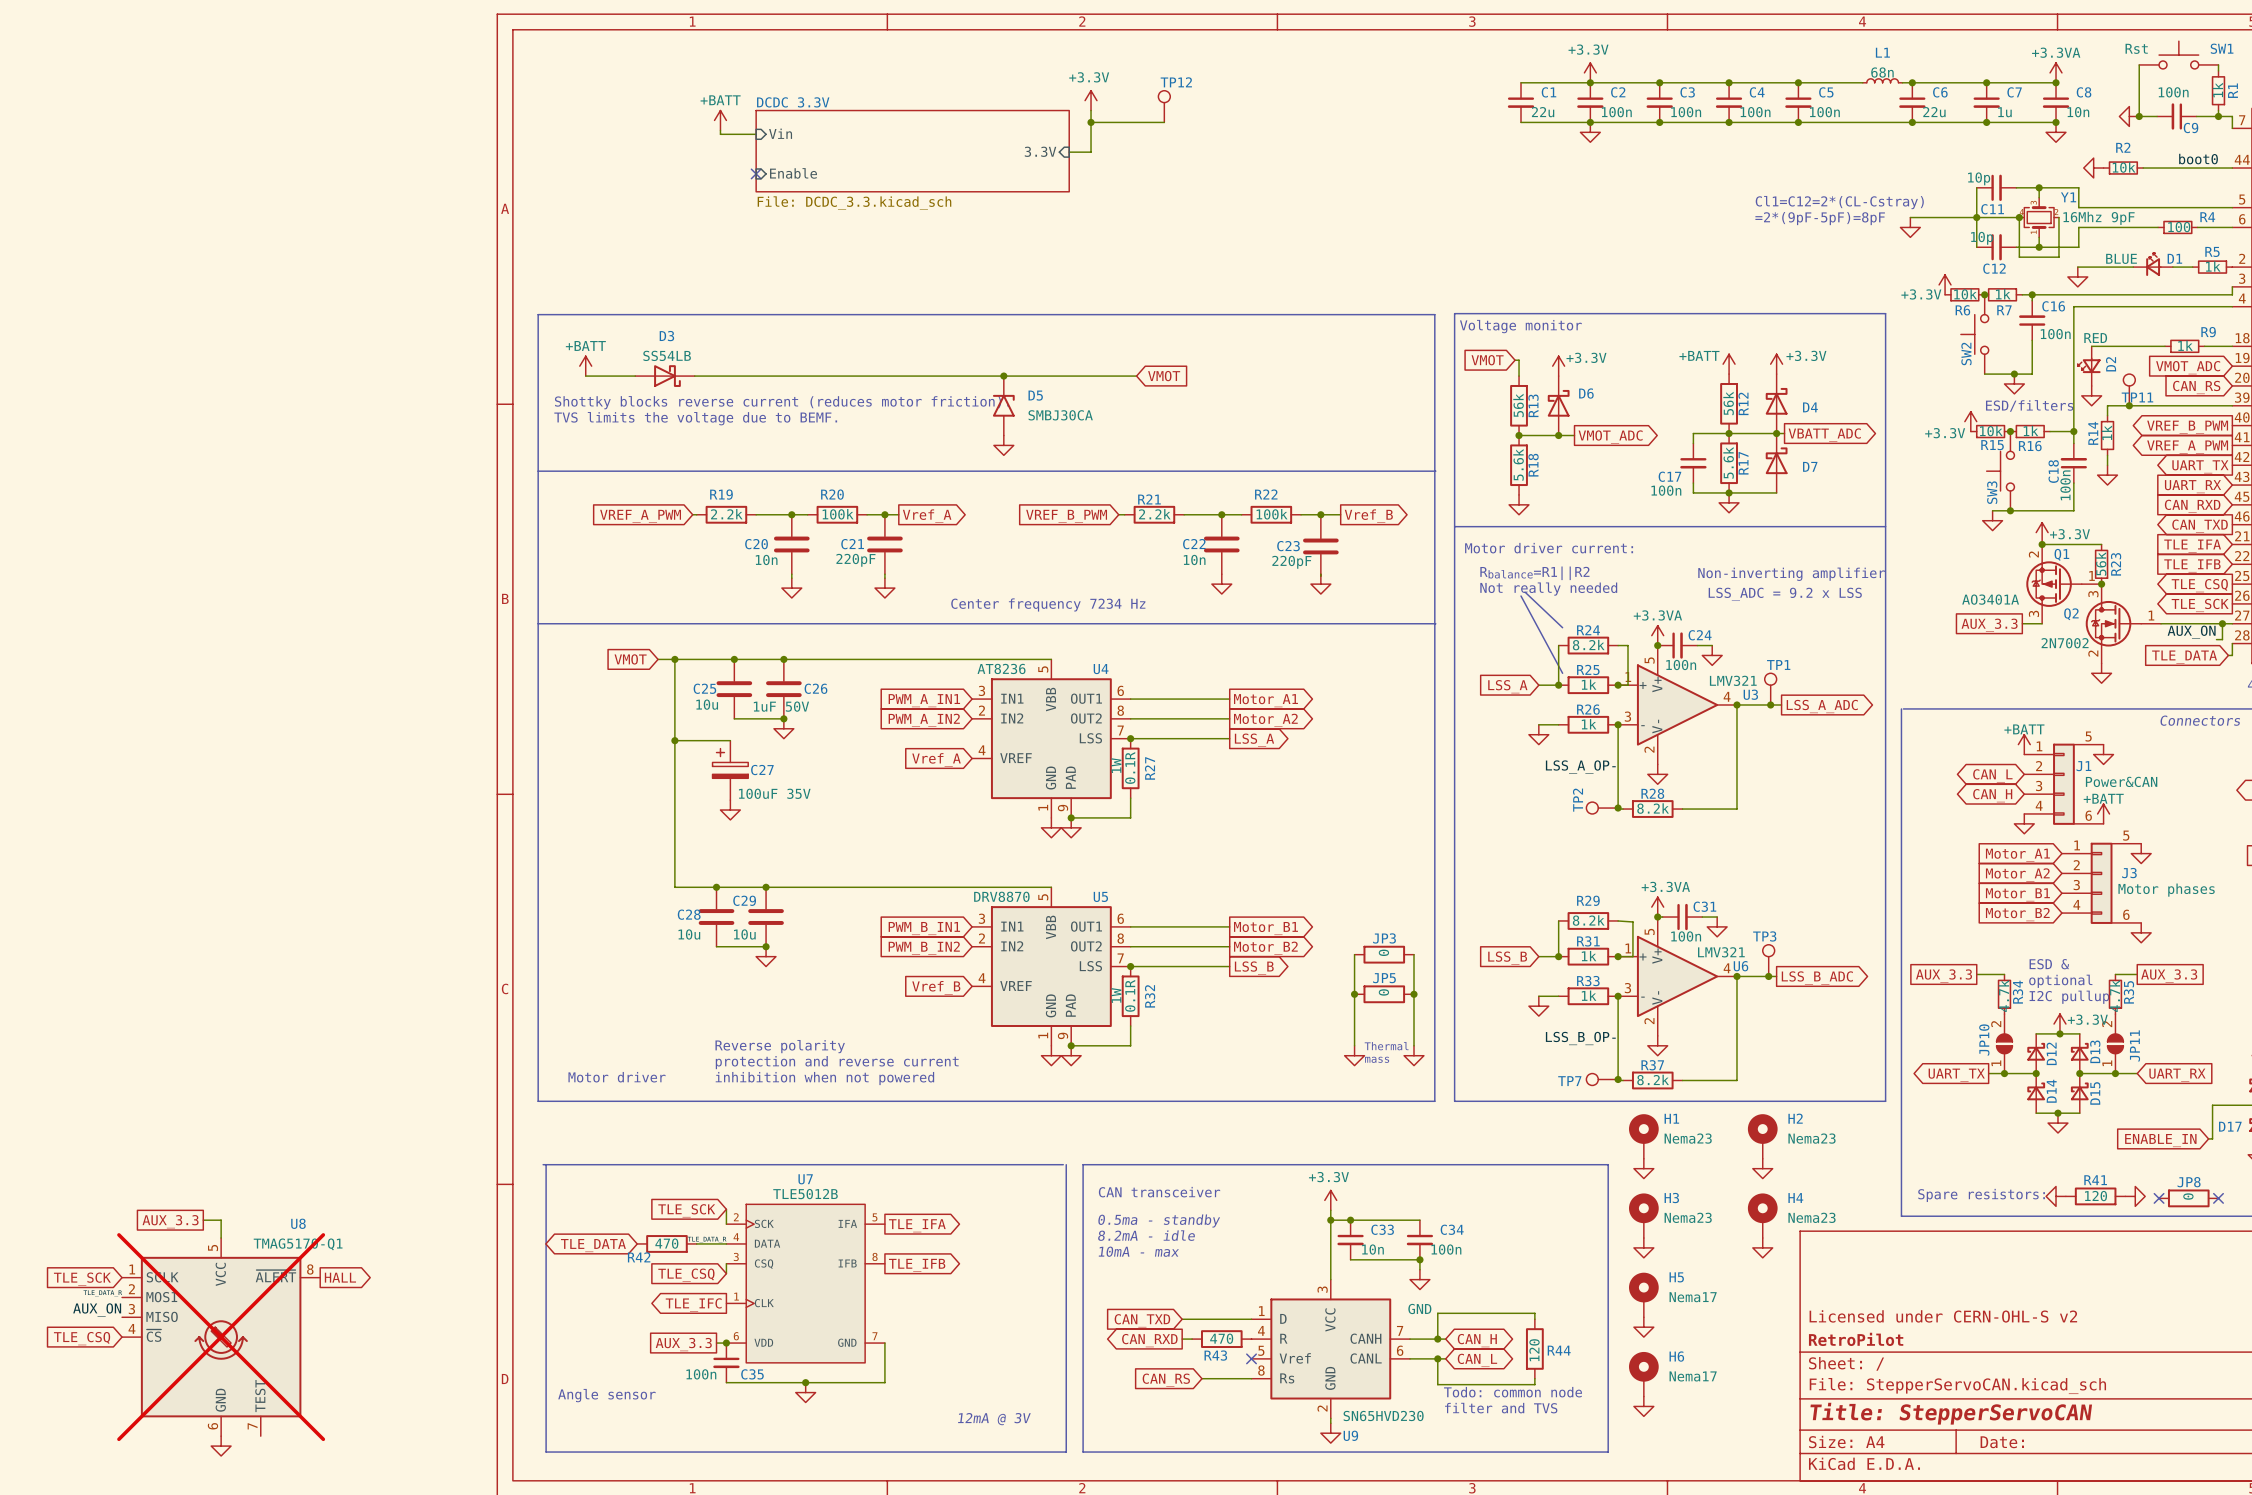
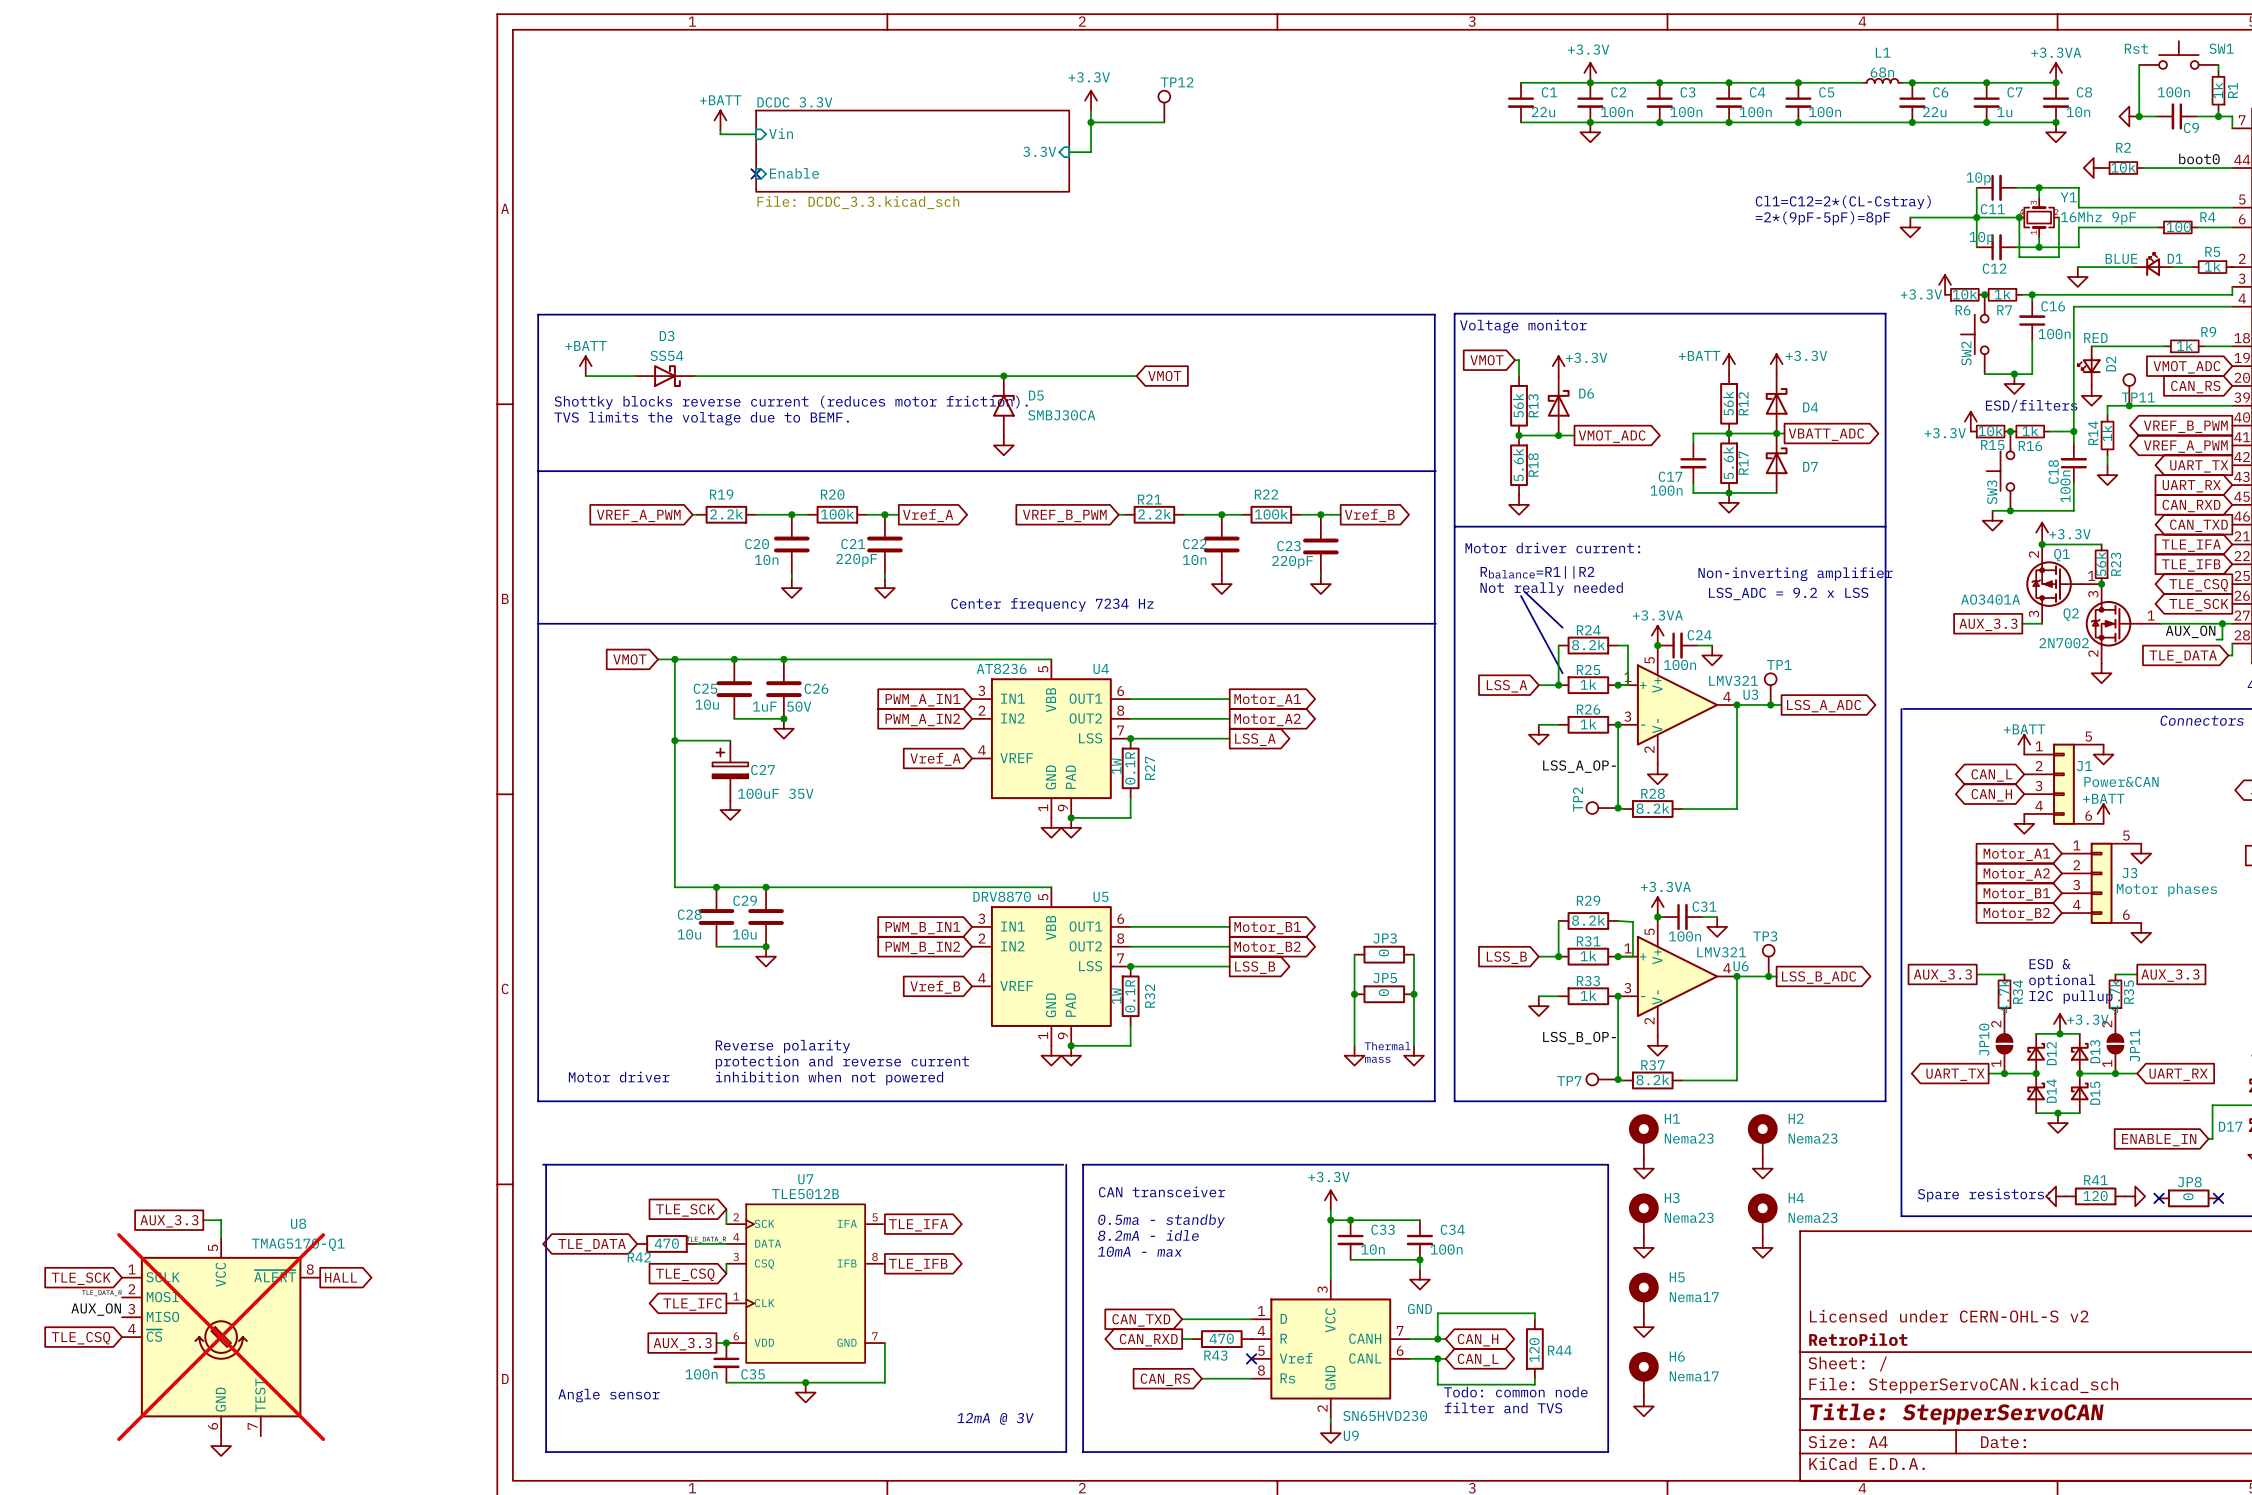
D3 value: SS54LB (667, 355) -> SS54 (667, 355)

